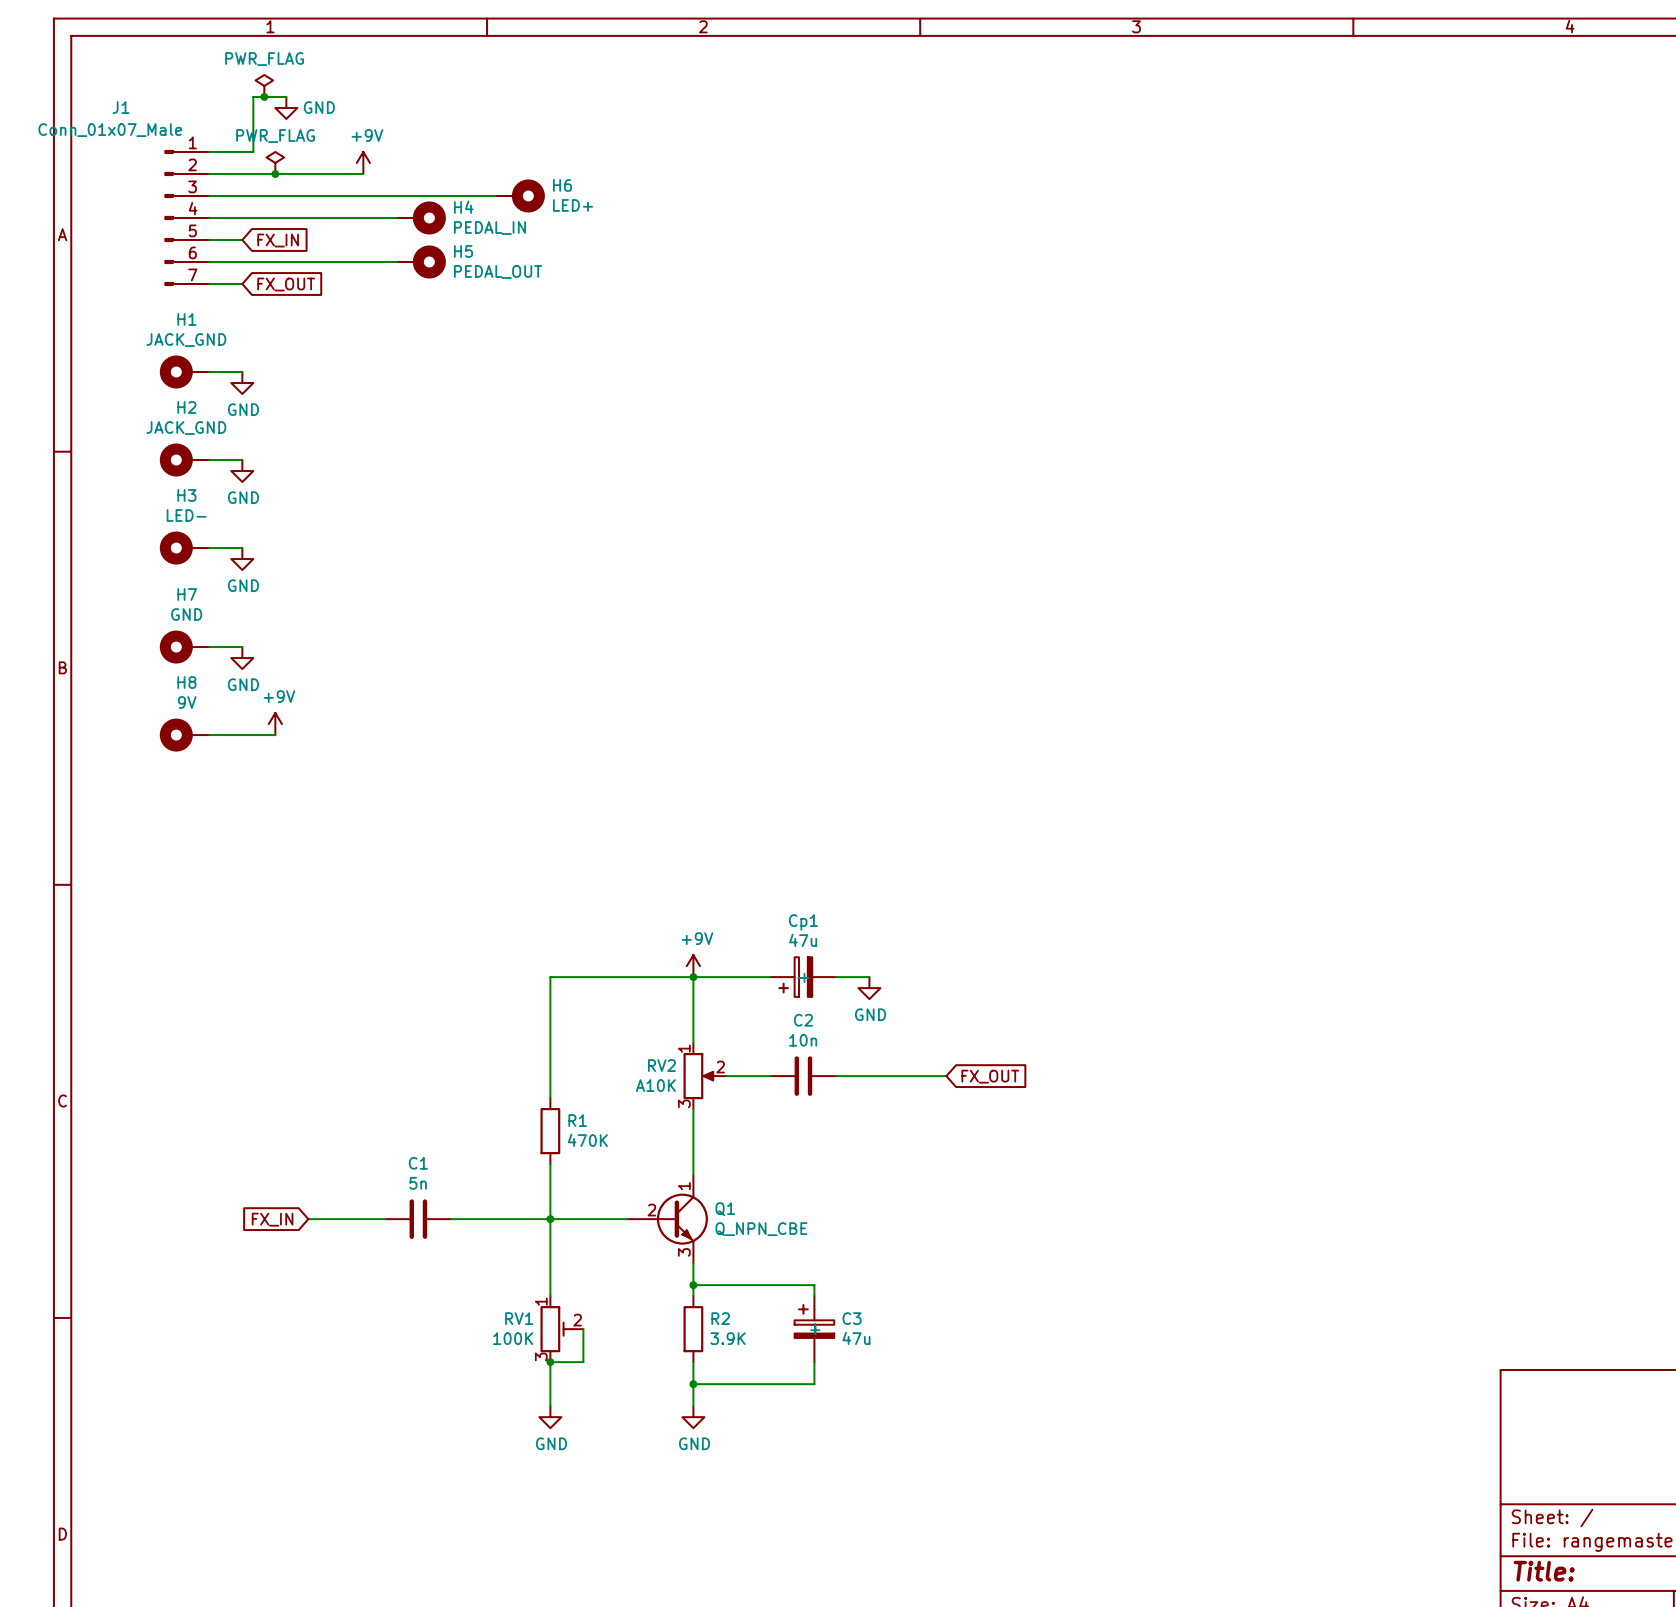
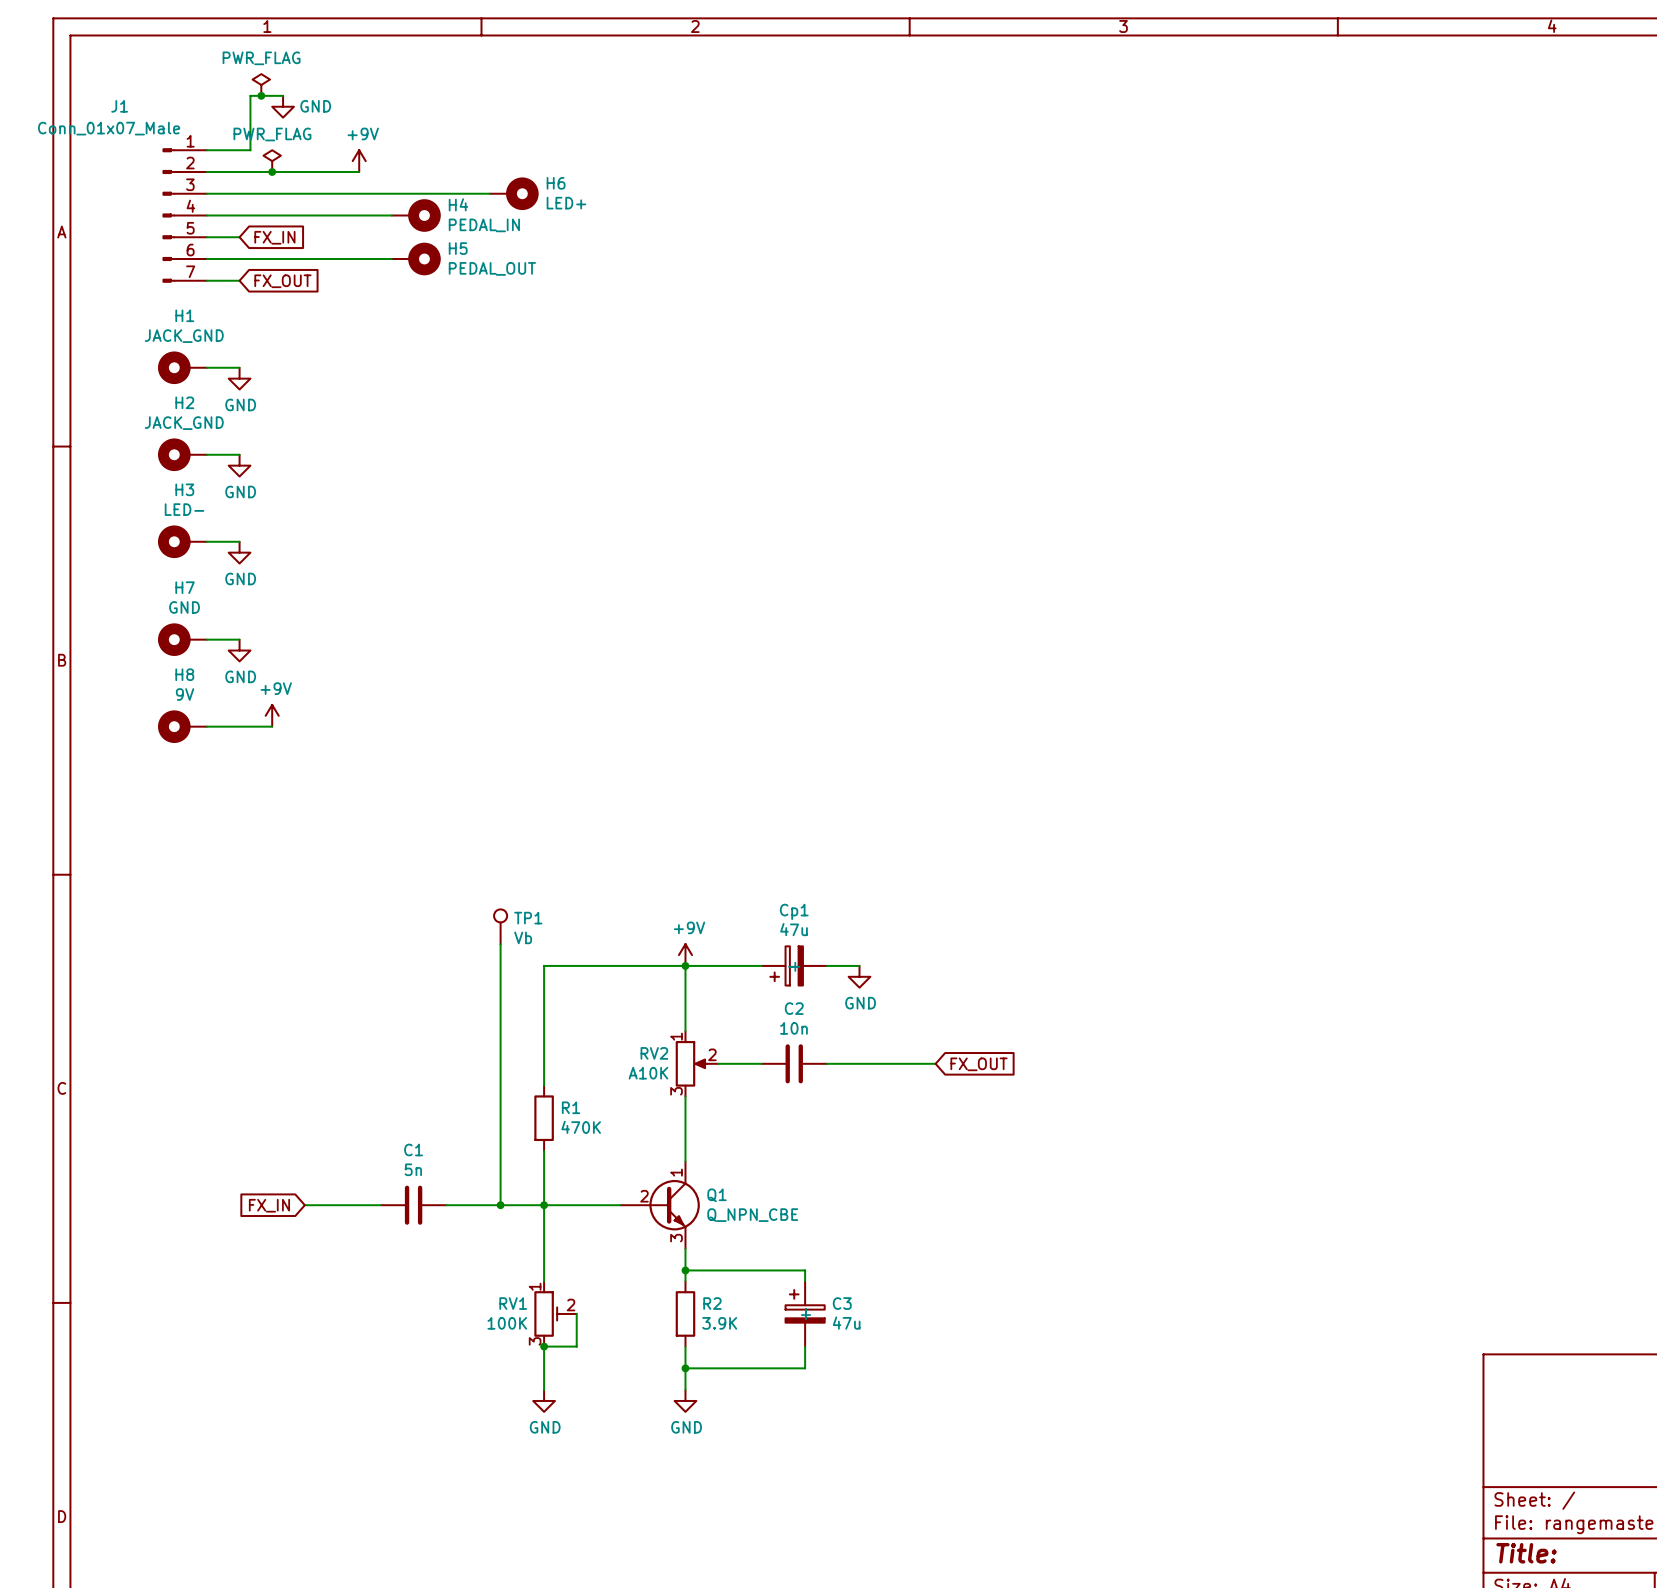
TP1: none -> Vb (500, 926)
wire: none -> (500, 944) (500, 1205)
junction: none -> (500, 1205)

